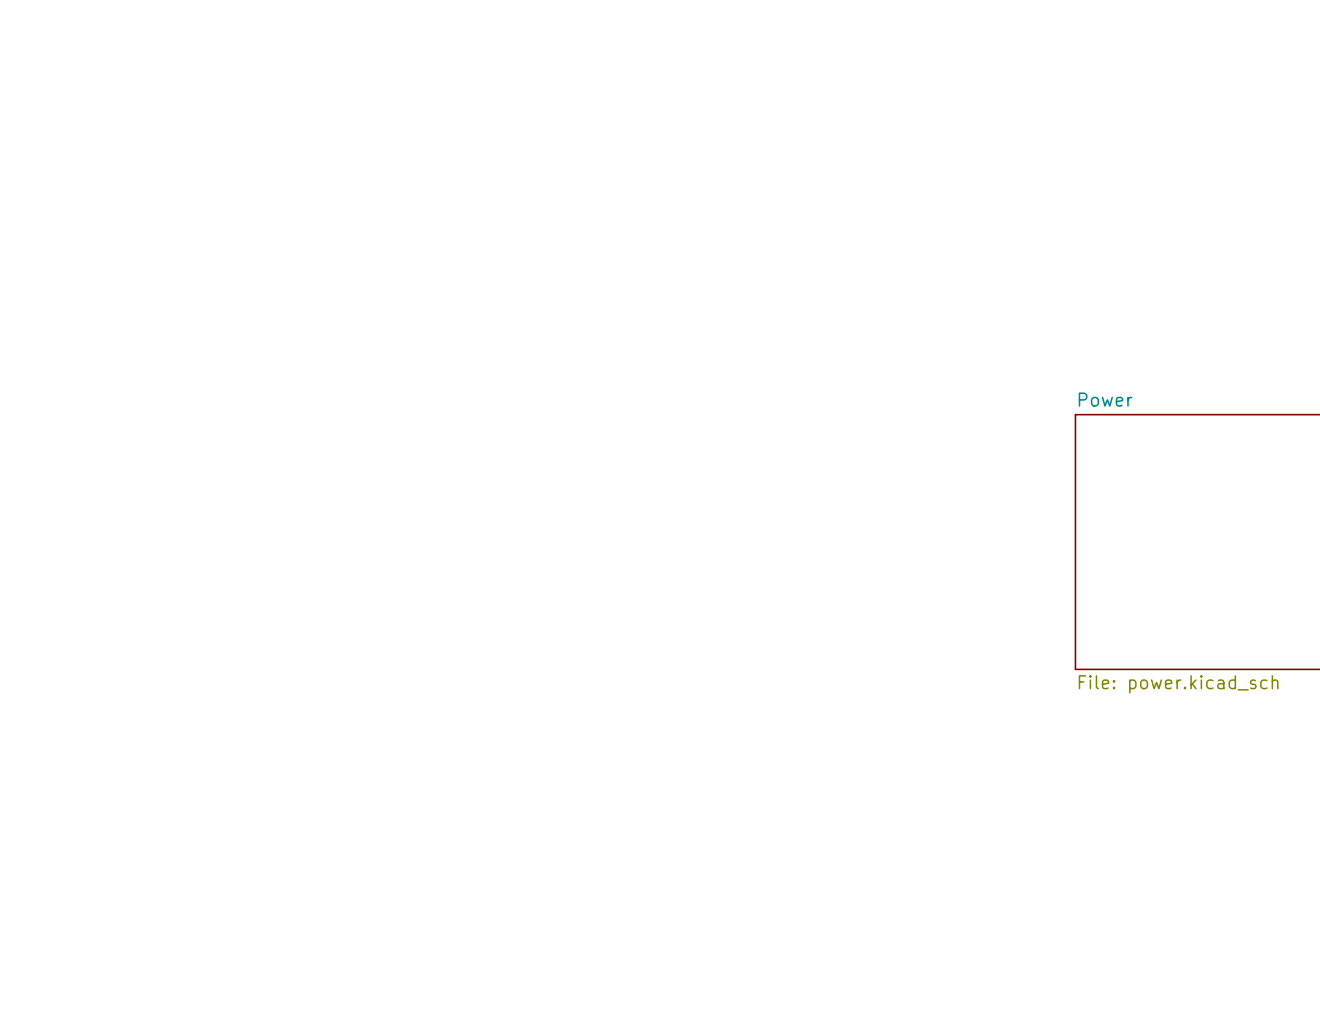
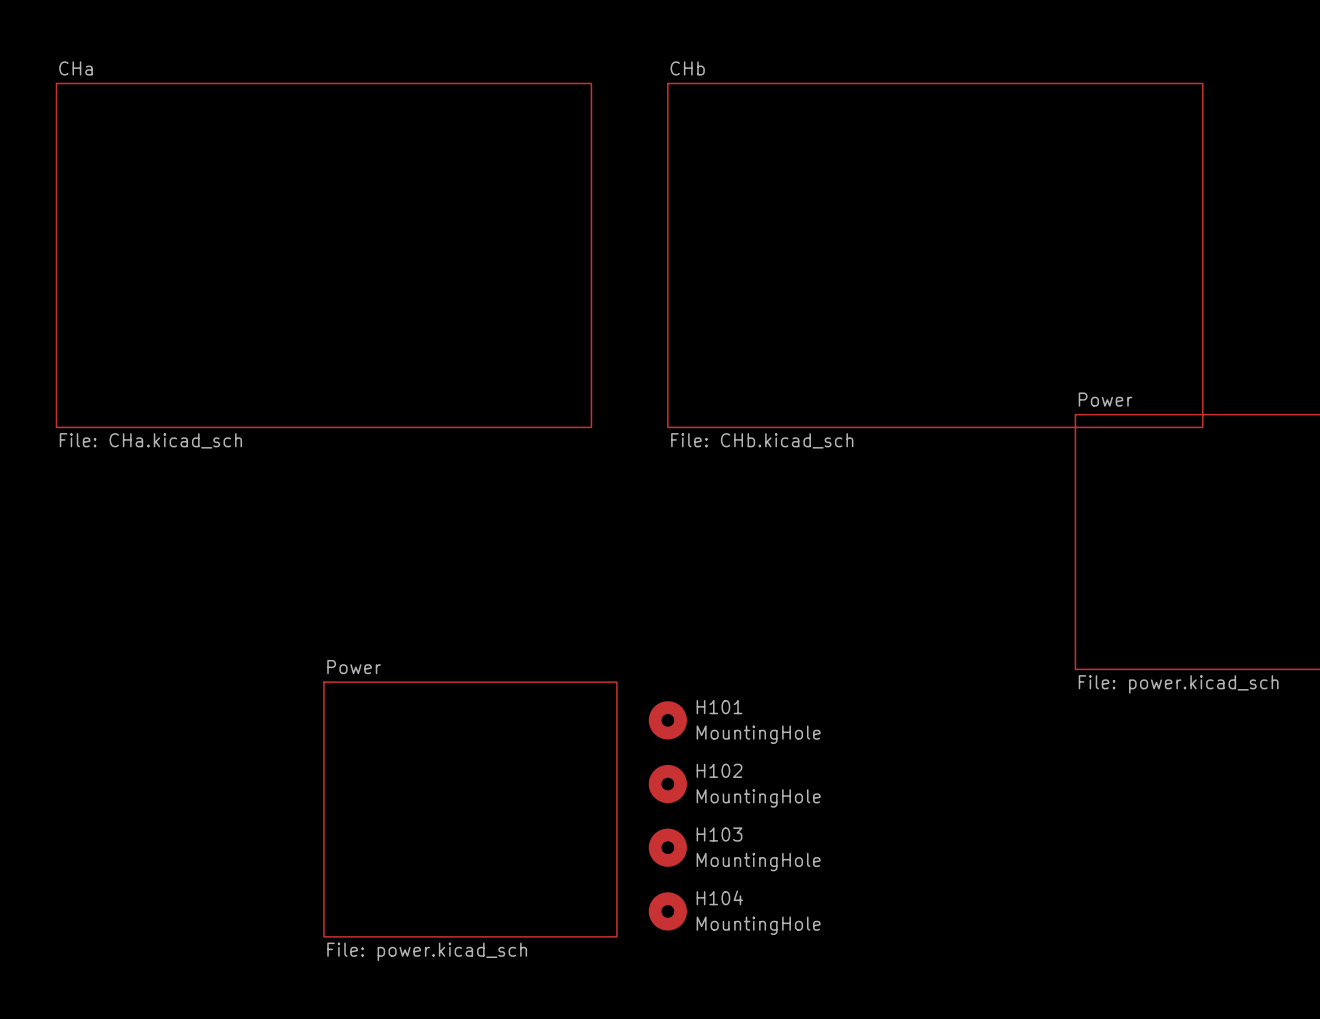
sheet CHa: none -> File: CHa.kicad_sch (323, 255)
sheet CHb: none -> File: CHb.kicad_sch (935, 255)
H101: none -> MountingHole (667, 720)
H102: none -> MountingHole (667, 784)
sheet Power: none -> File: power.kicad_sch (470, 809)
H103: none -> MountingHole (667, 847)
H104: none -> MountingHole (667, 911)

